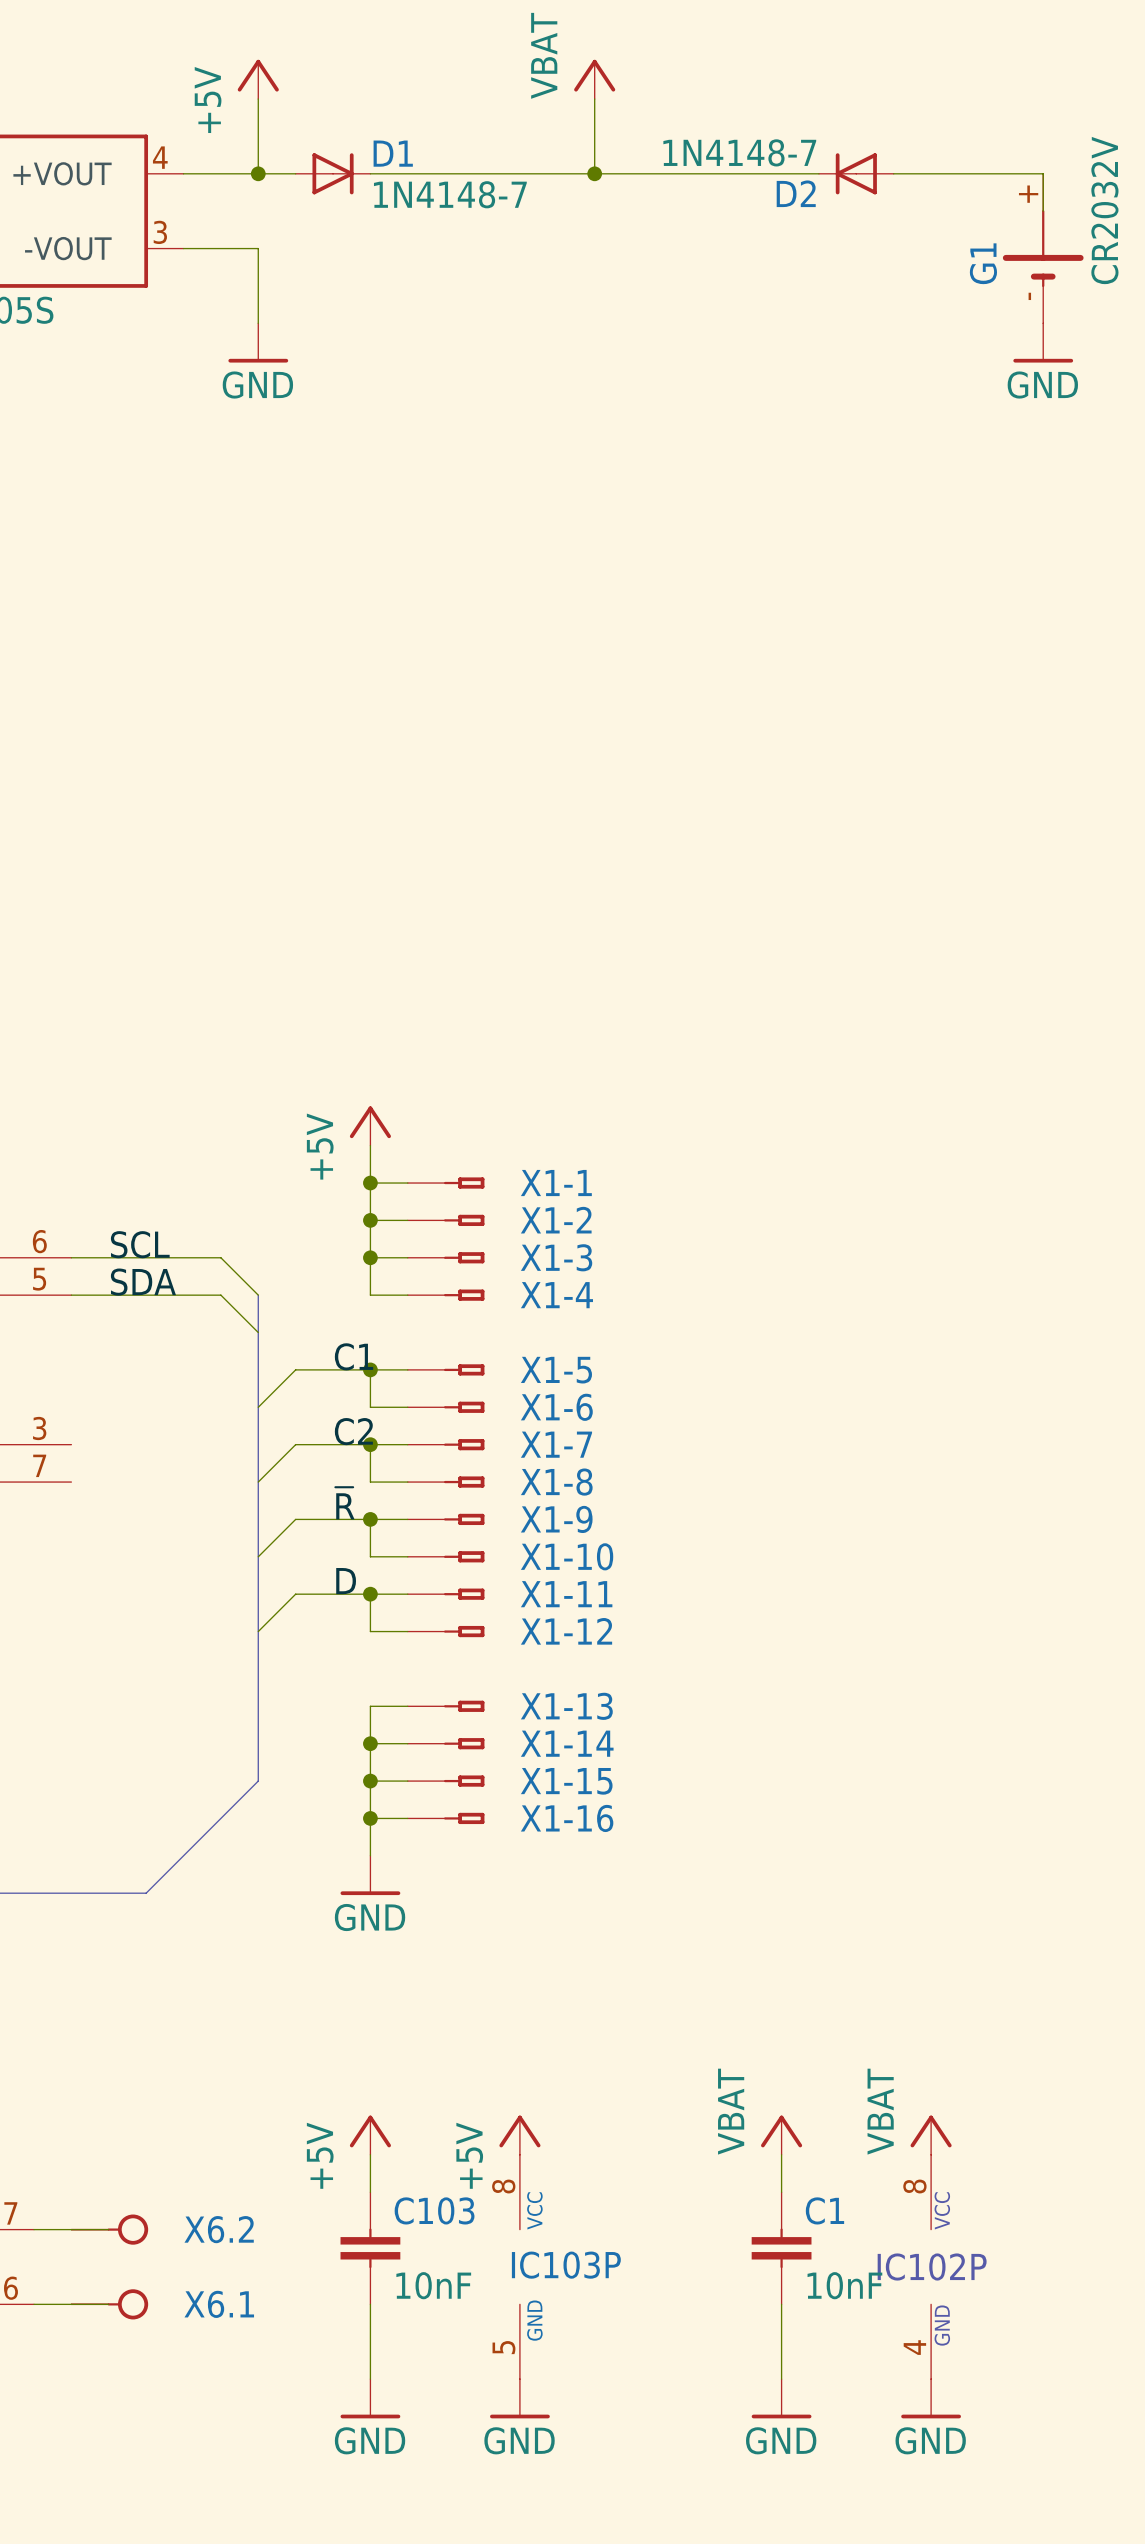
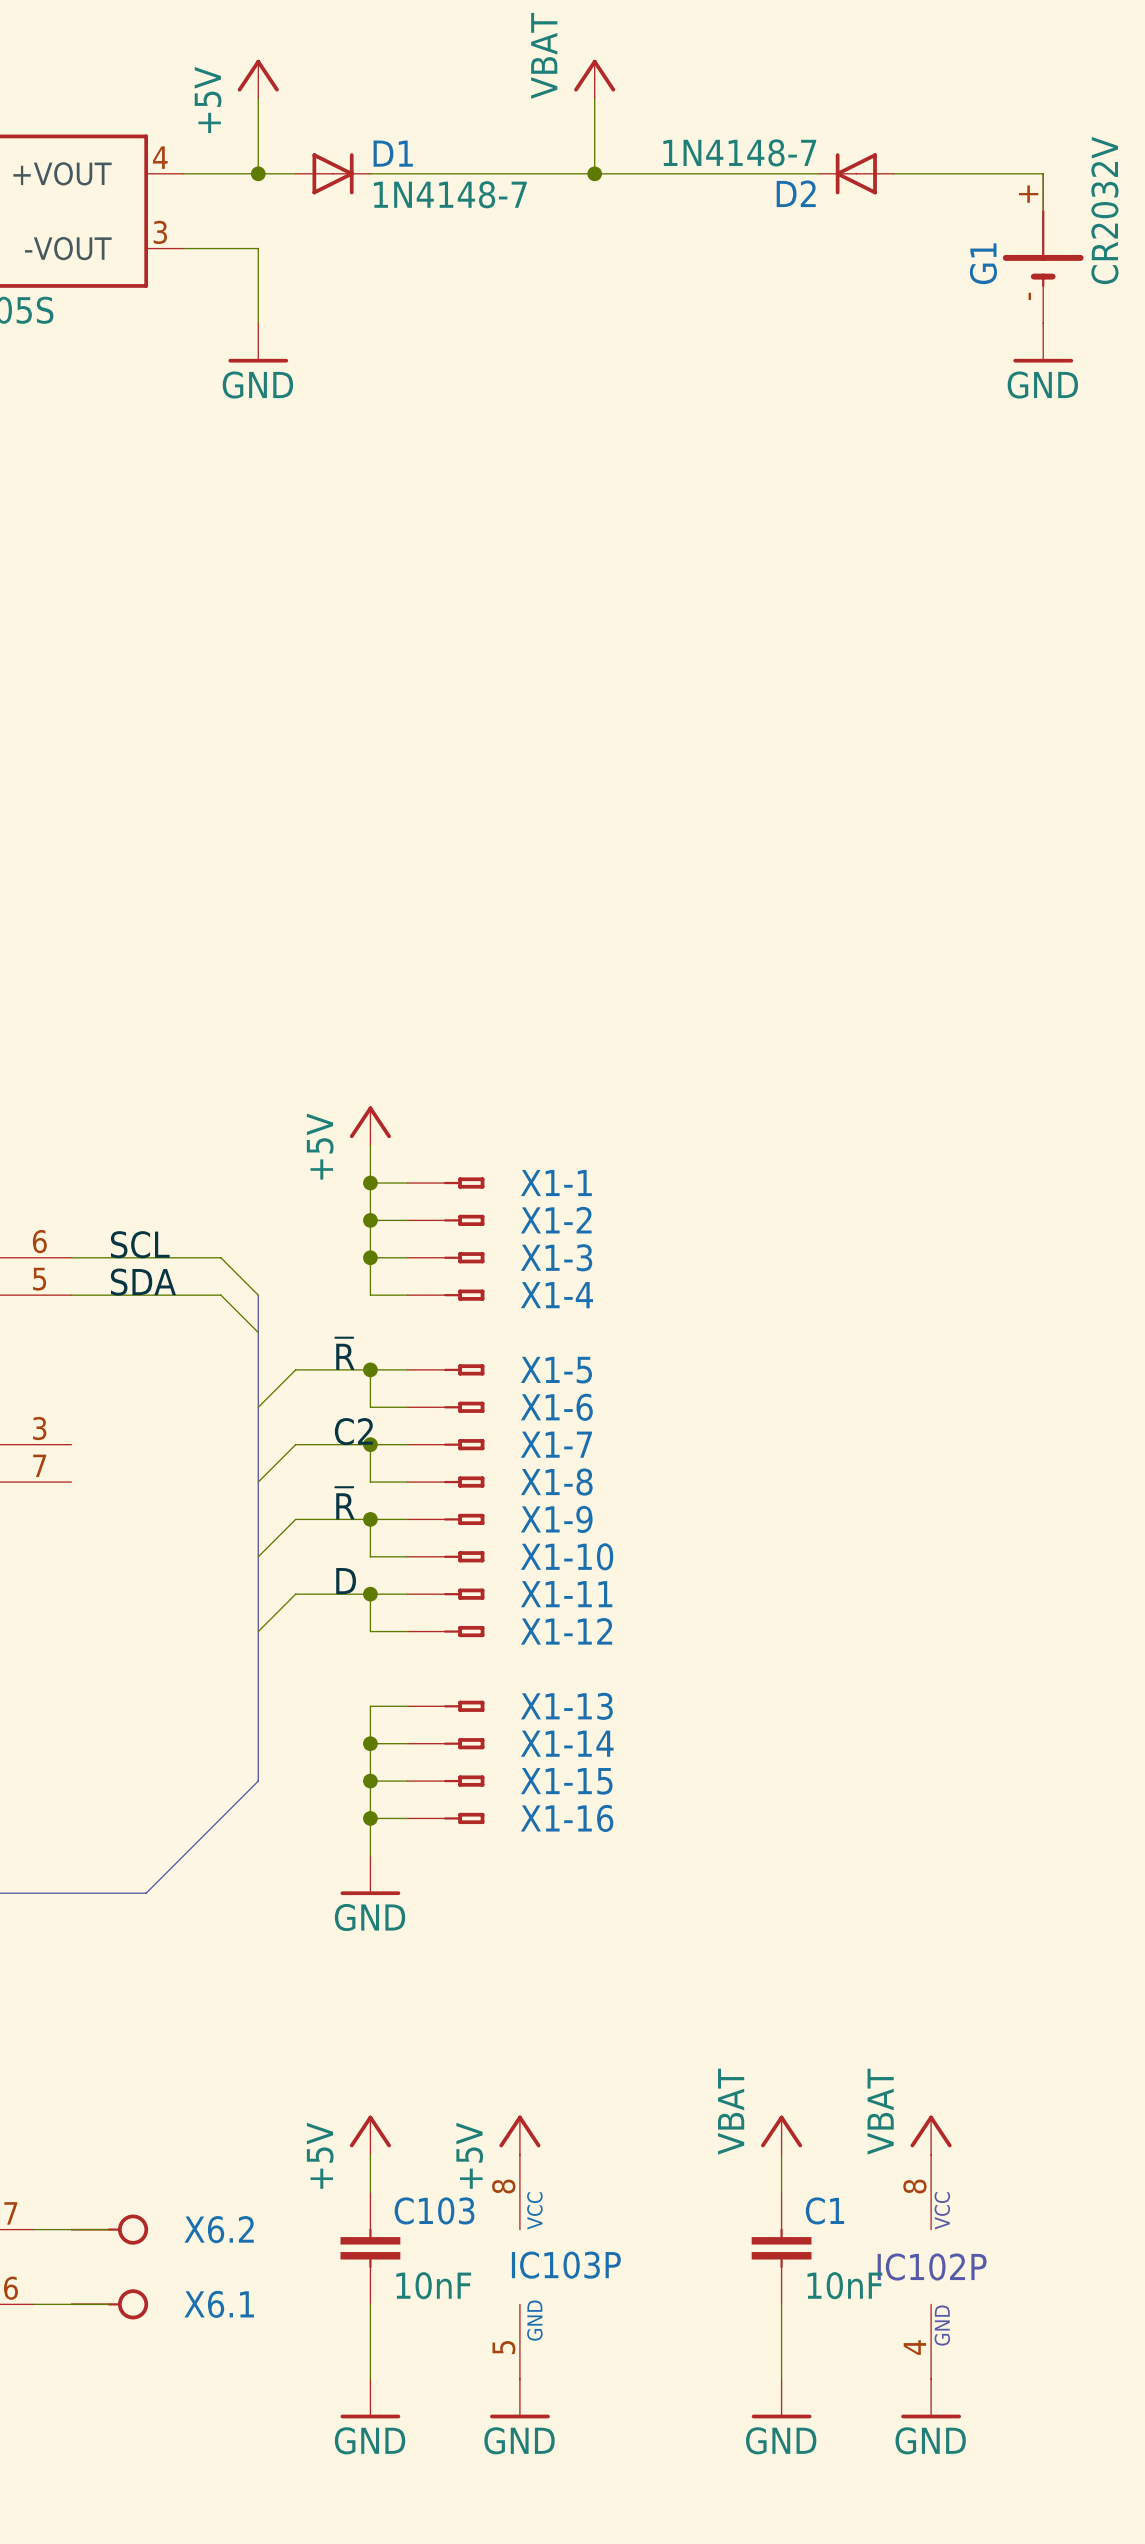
label: C1 (354, 1356) -> ~{R} (344, 1353)

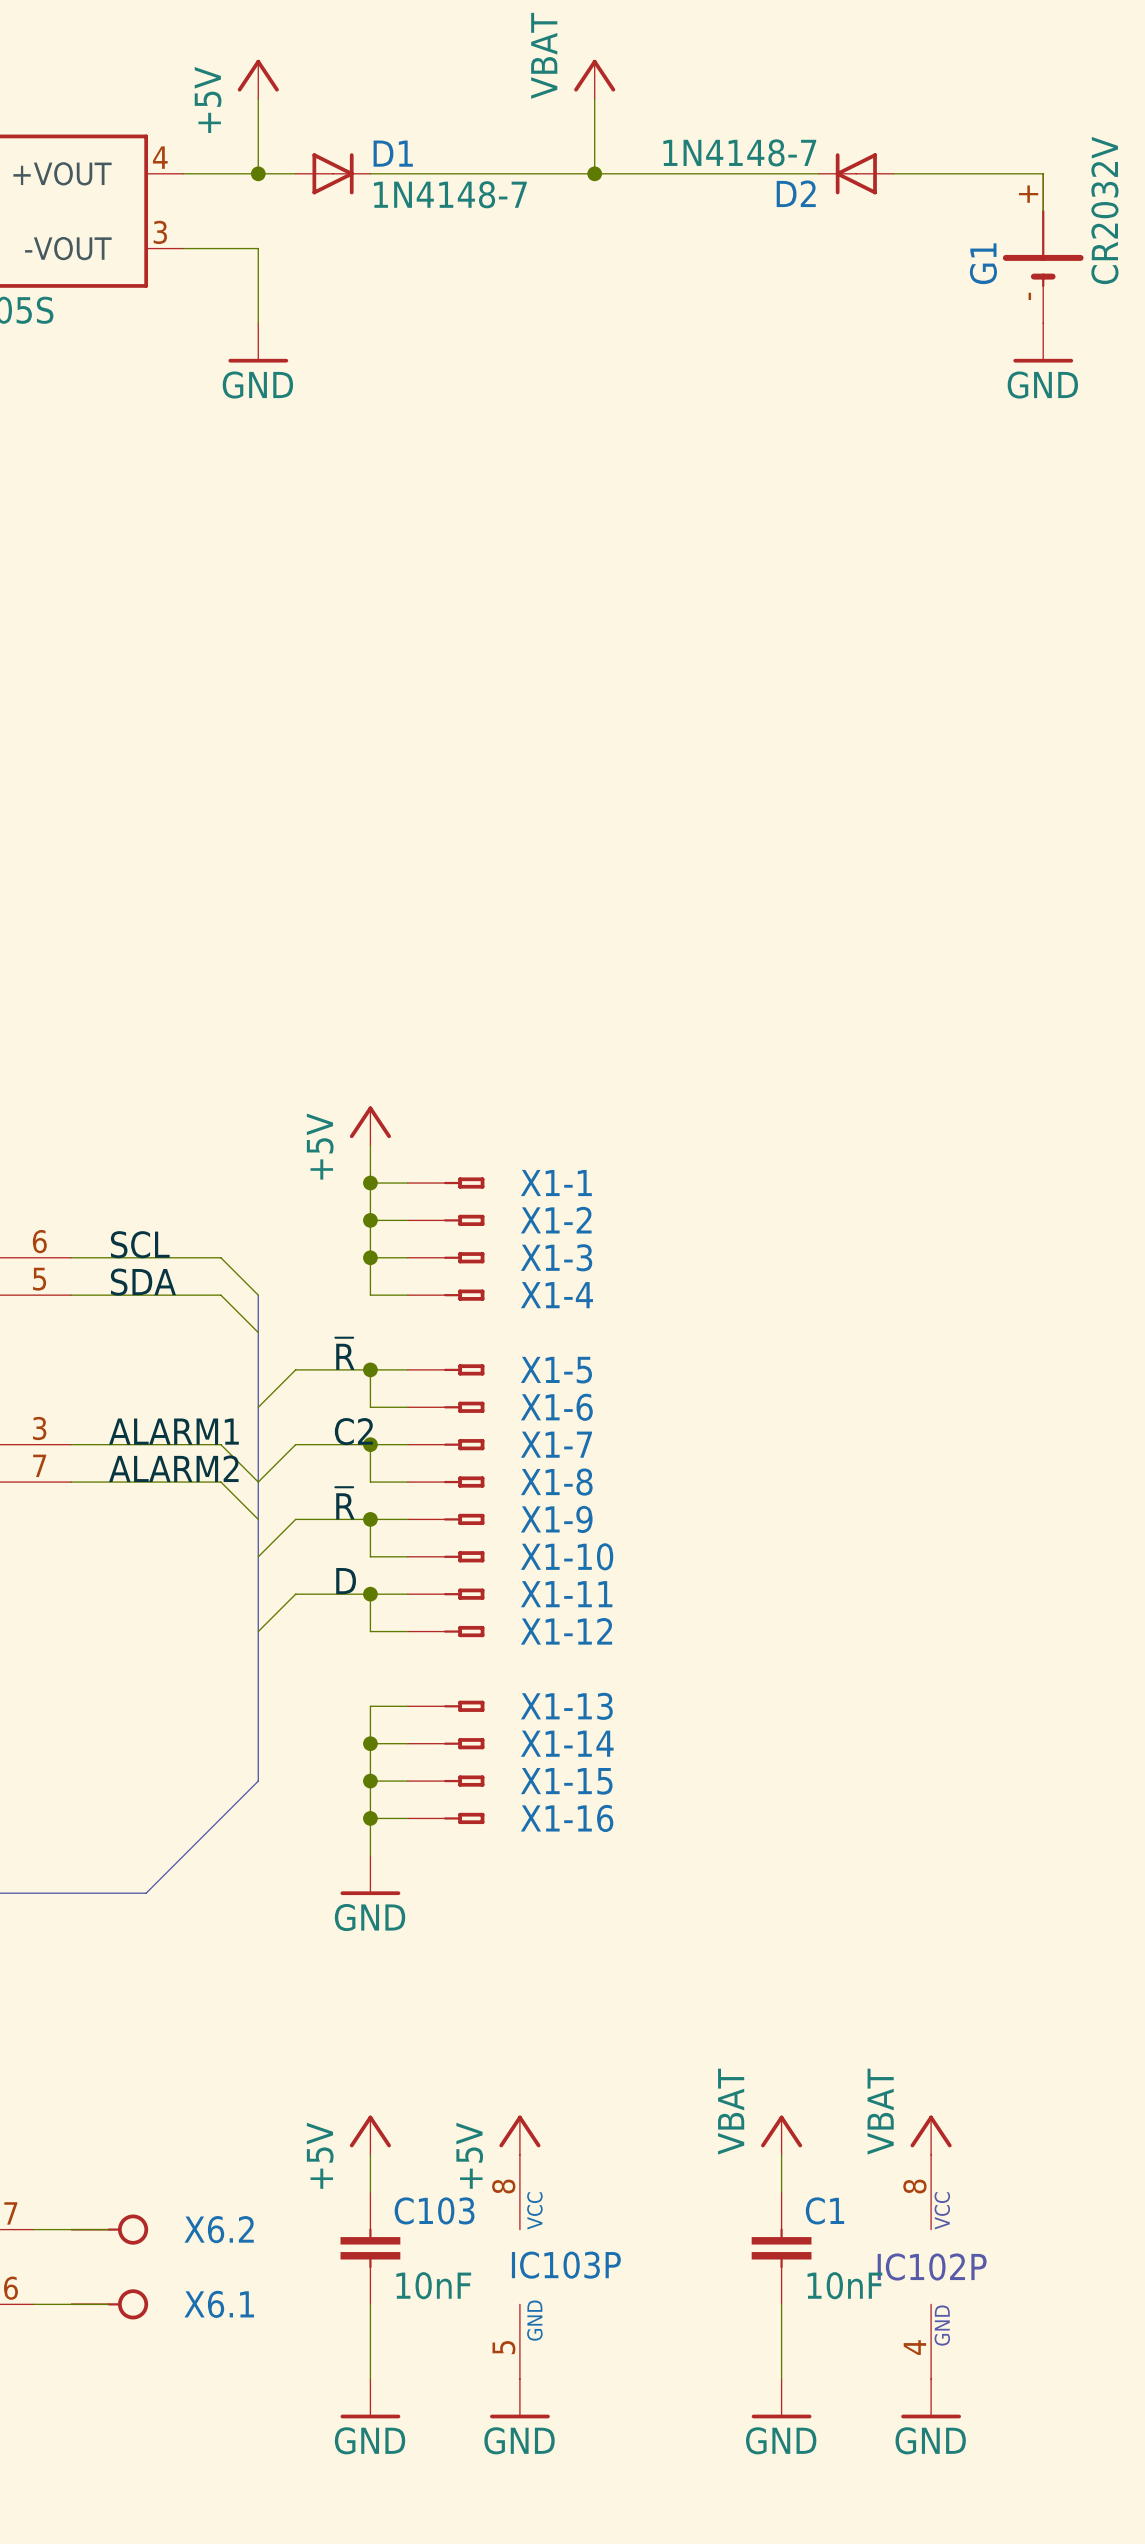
label: none -> ALARM1 (173, 1431)
wire: none -> (71, 1444) (220, 1444) (258, 1482)
label: none -> ALARM2 (173, 1468)
wire: none -> (71, 1482) (220, 1482) (258, 1519)

